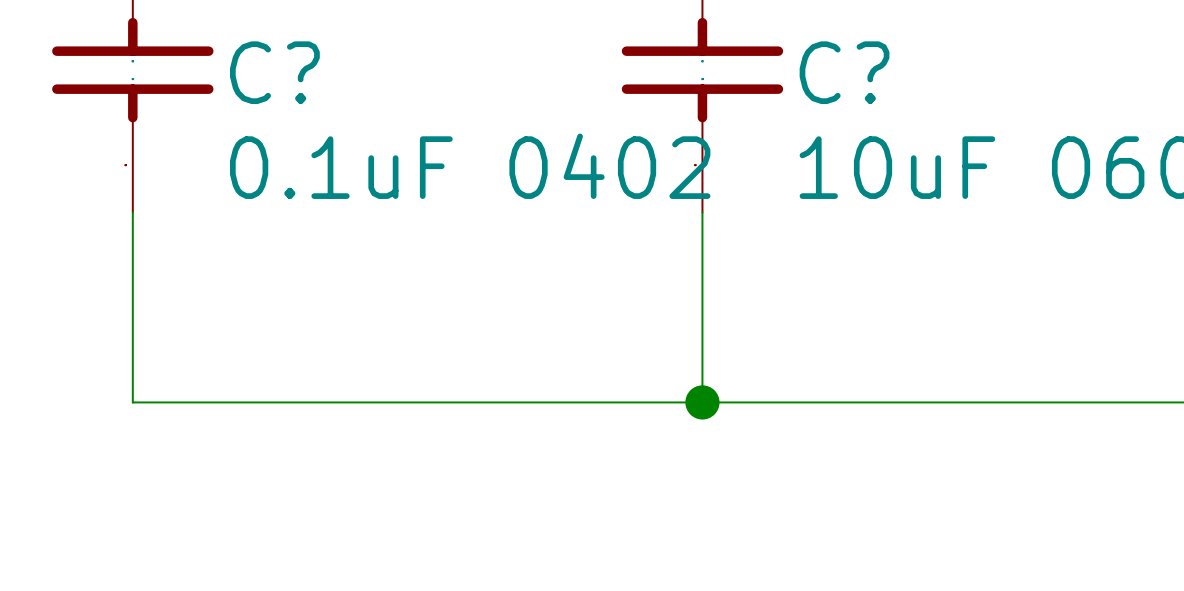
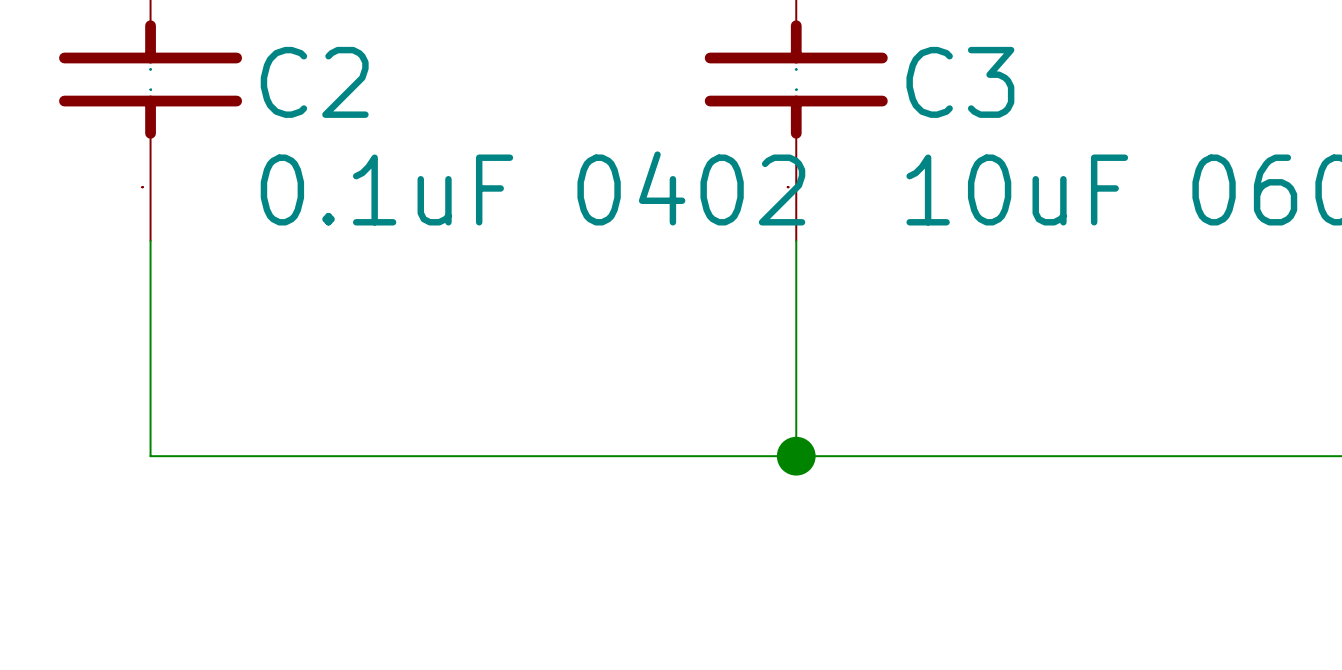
C? name: C? (274, 72) -> C2 (314, 82)
C? name: C? (844, 72) -> C3 (960, 82)

